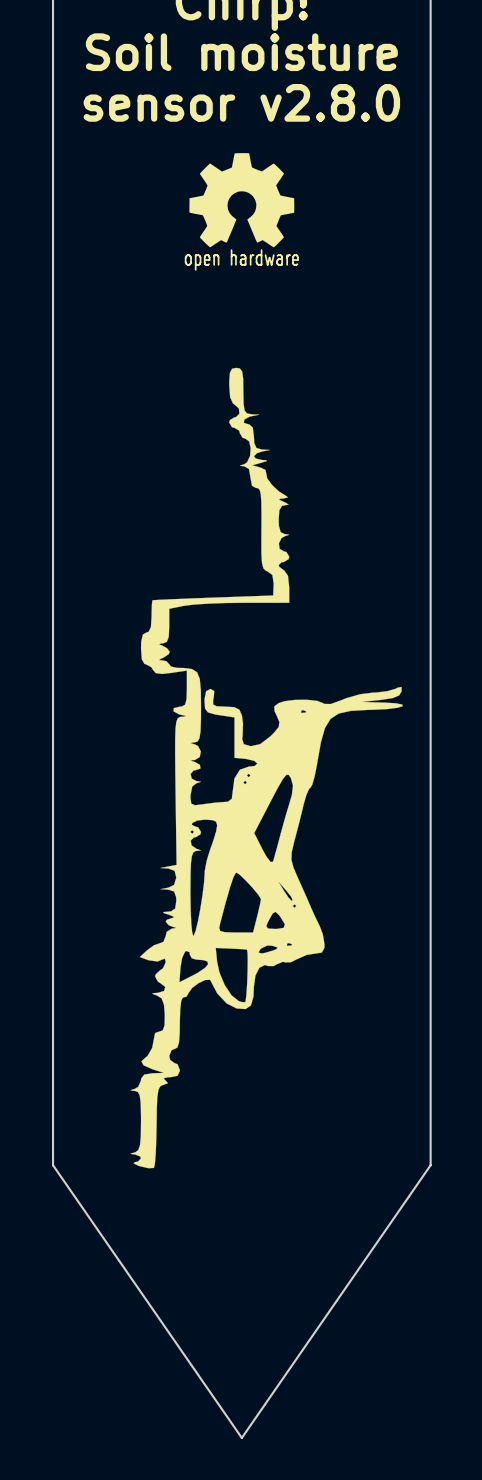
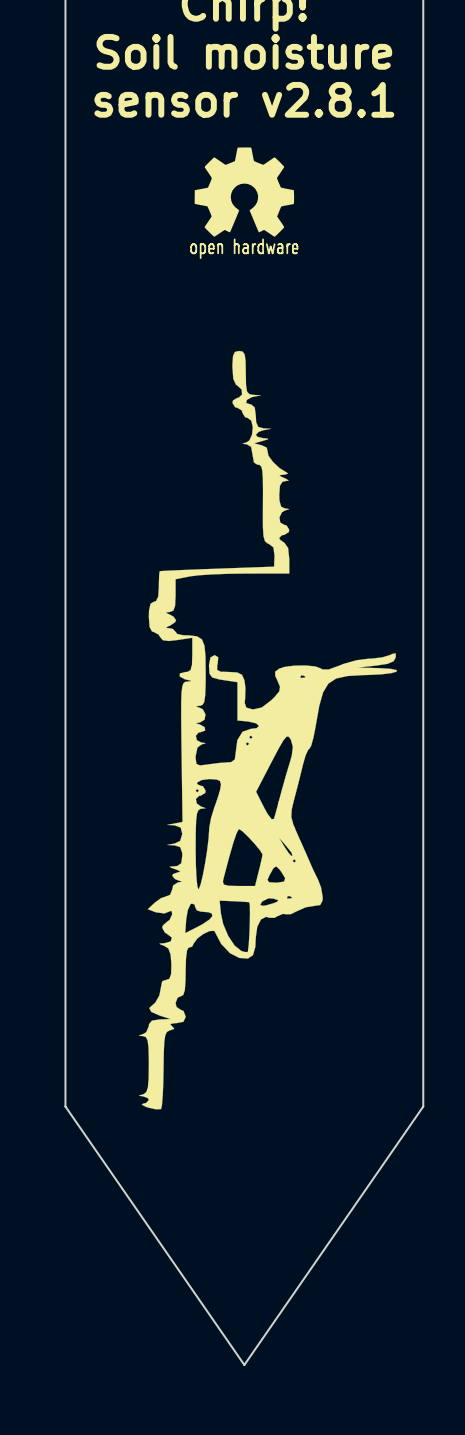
text: sensor v2.8.0 (241, 102) -> sensor v2.8.1 (244, 99)

